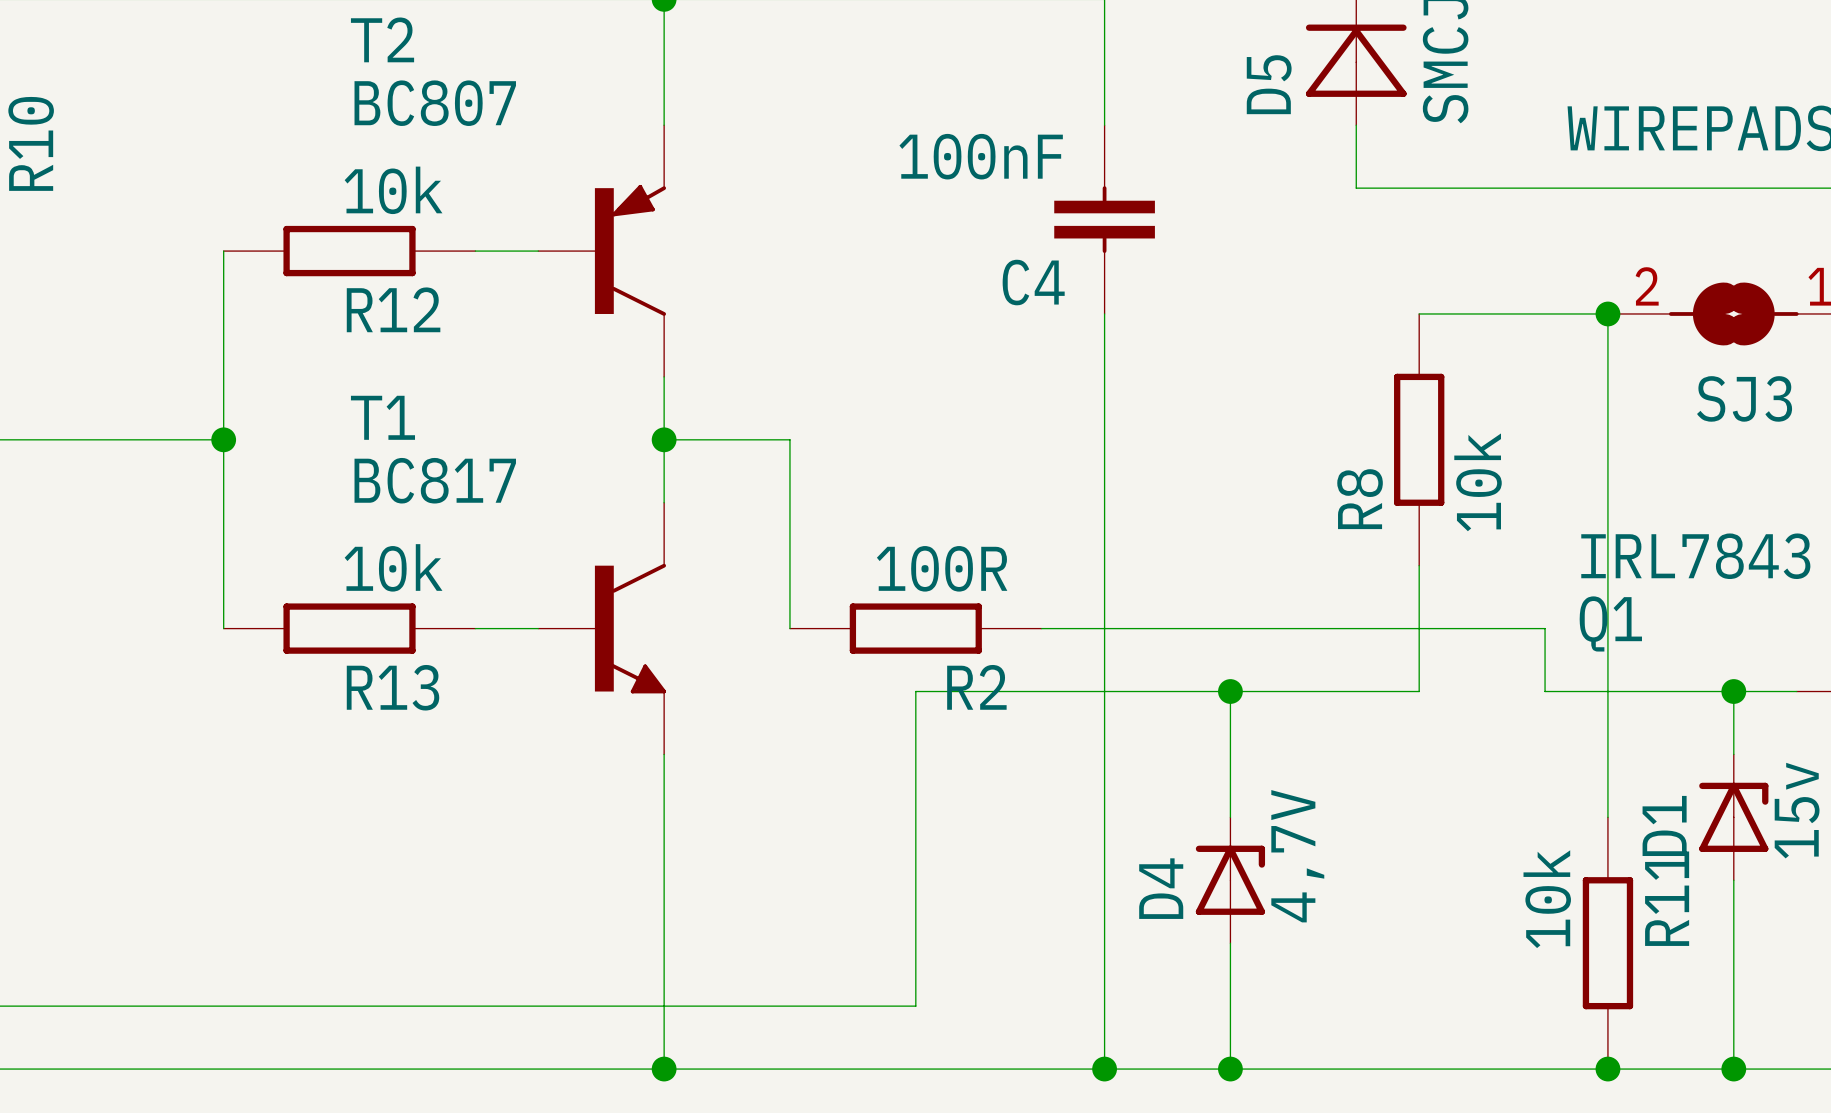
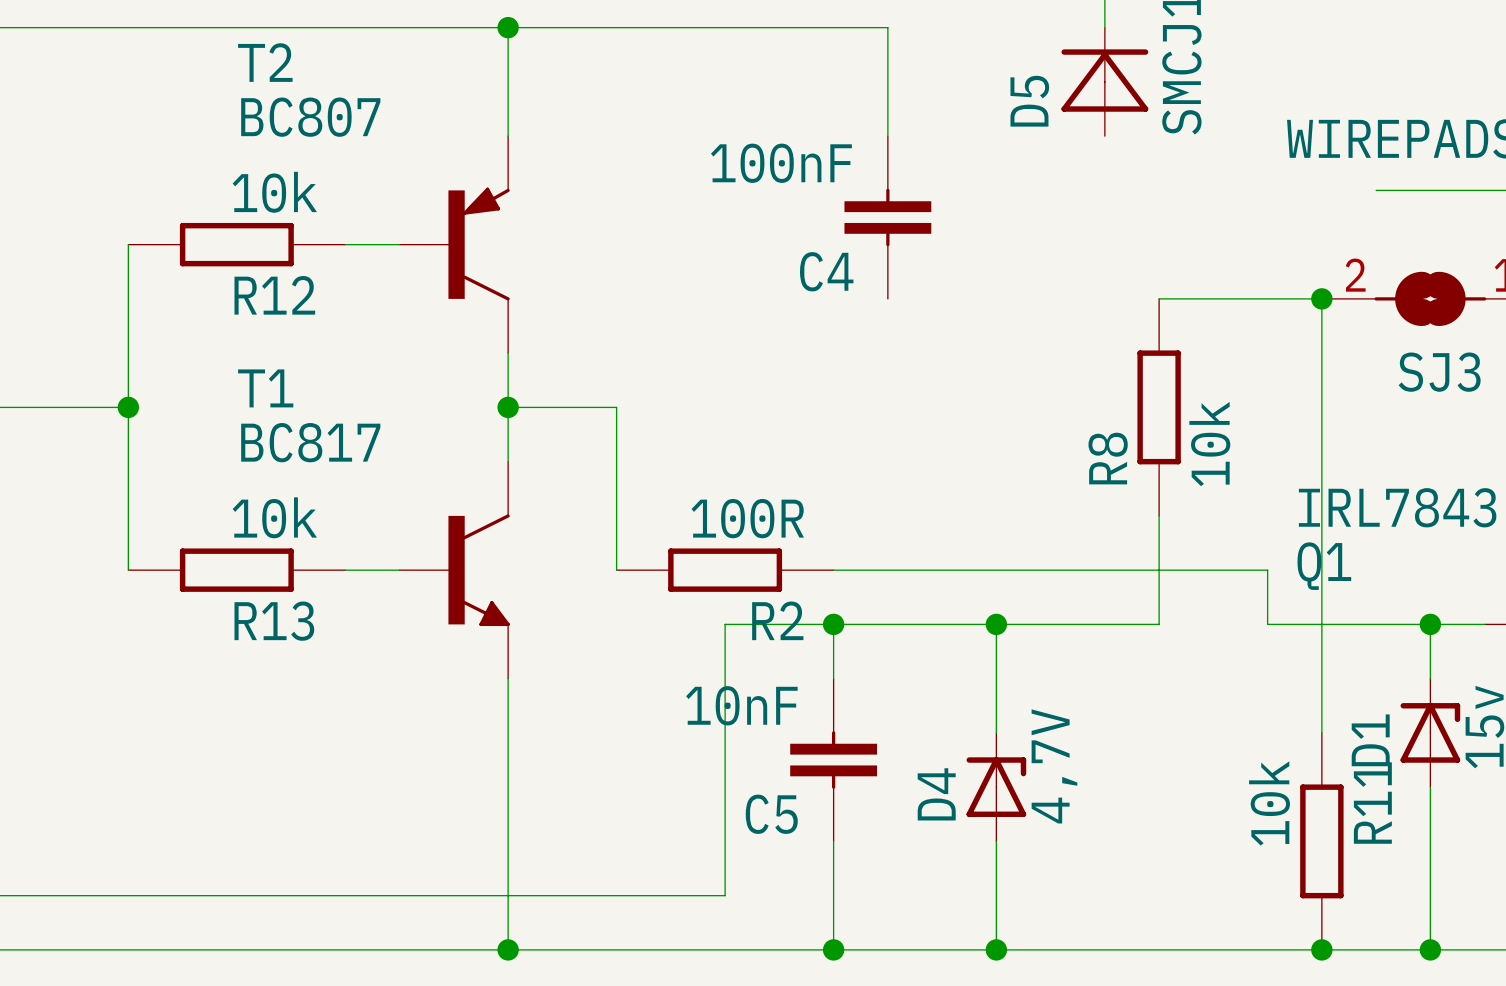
wire: (1356, 125) (1356, 188) (1670, 188) -> none
wire: (1104, 313) (1104, 1069) -> none
wire: none -> (833, 624) (833, 678)
junction: none -> (833, 624)
C5: none -> 10nF (833, 760)
wire: none -> (833, 841) (833, 949)
junction position: (1104, 1069) -> (833, 949)

